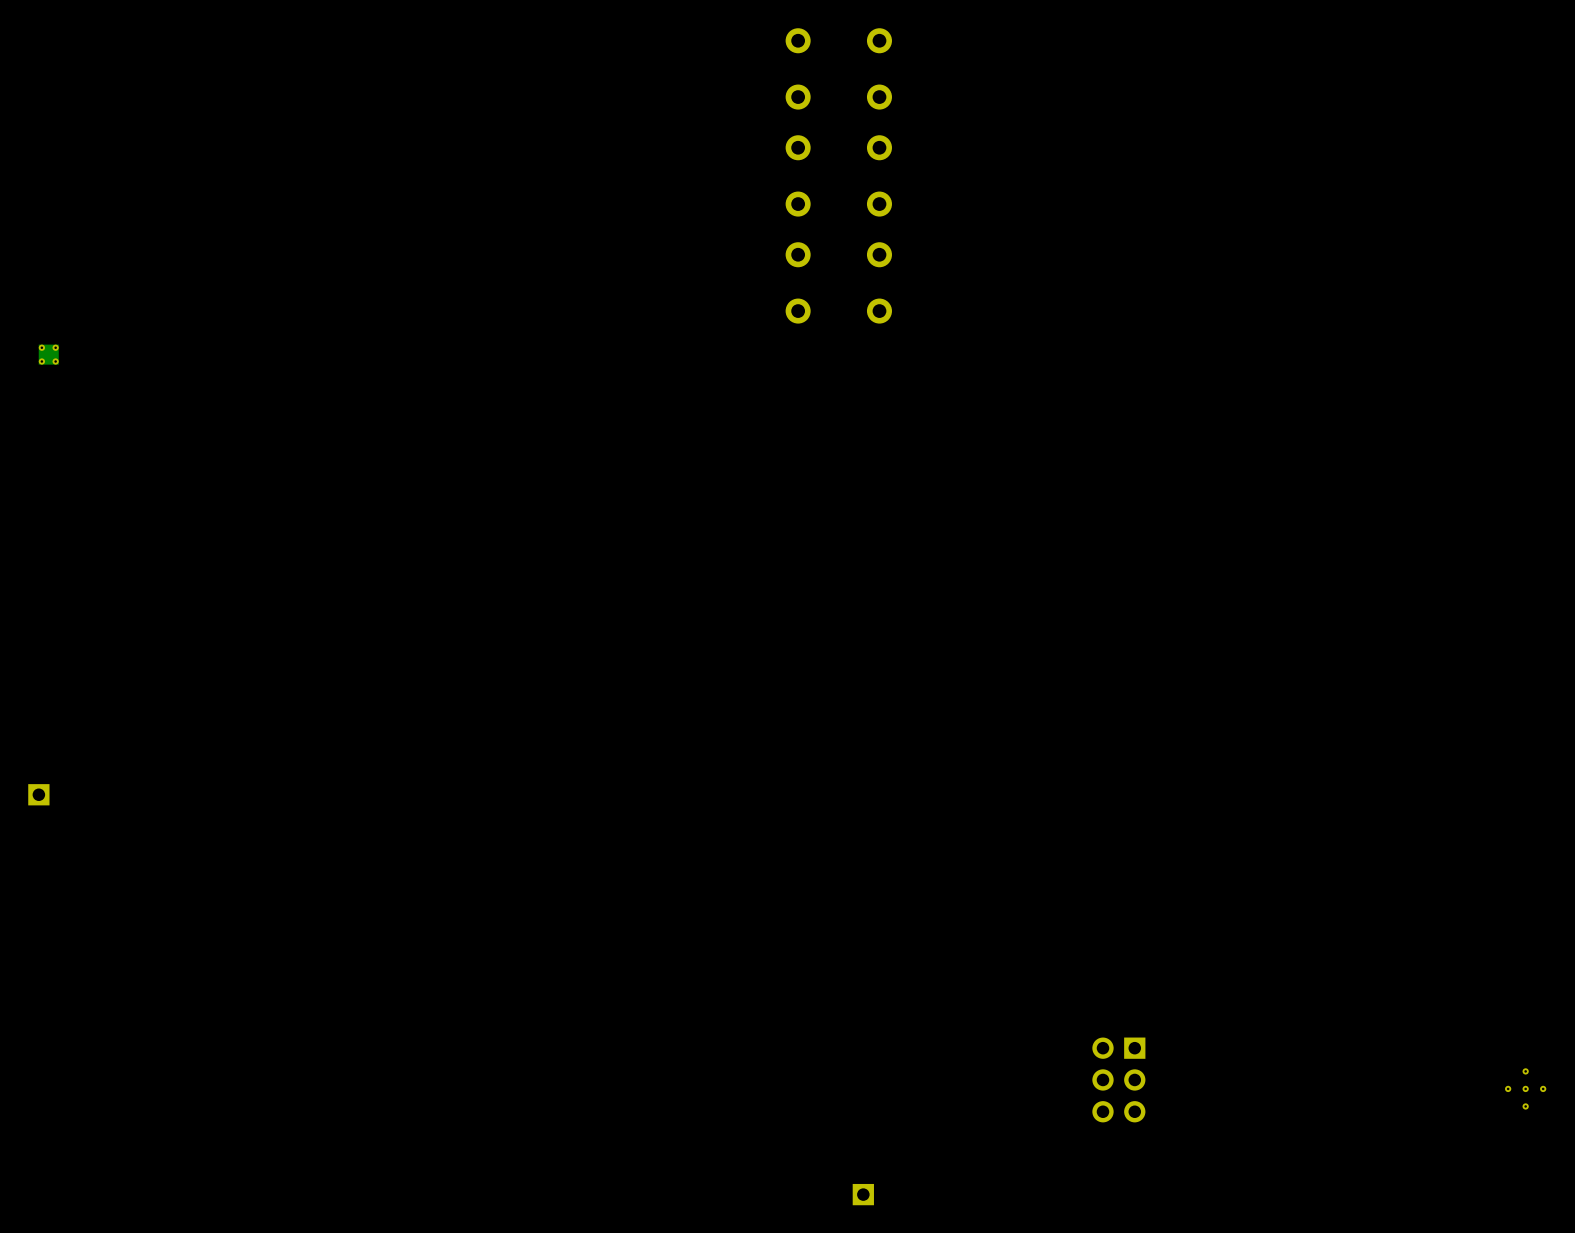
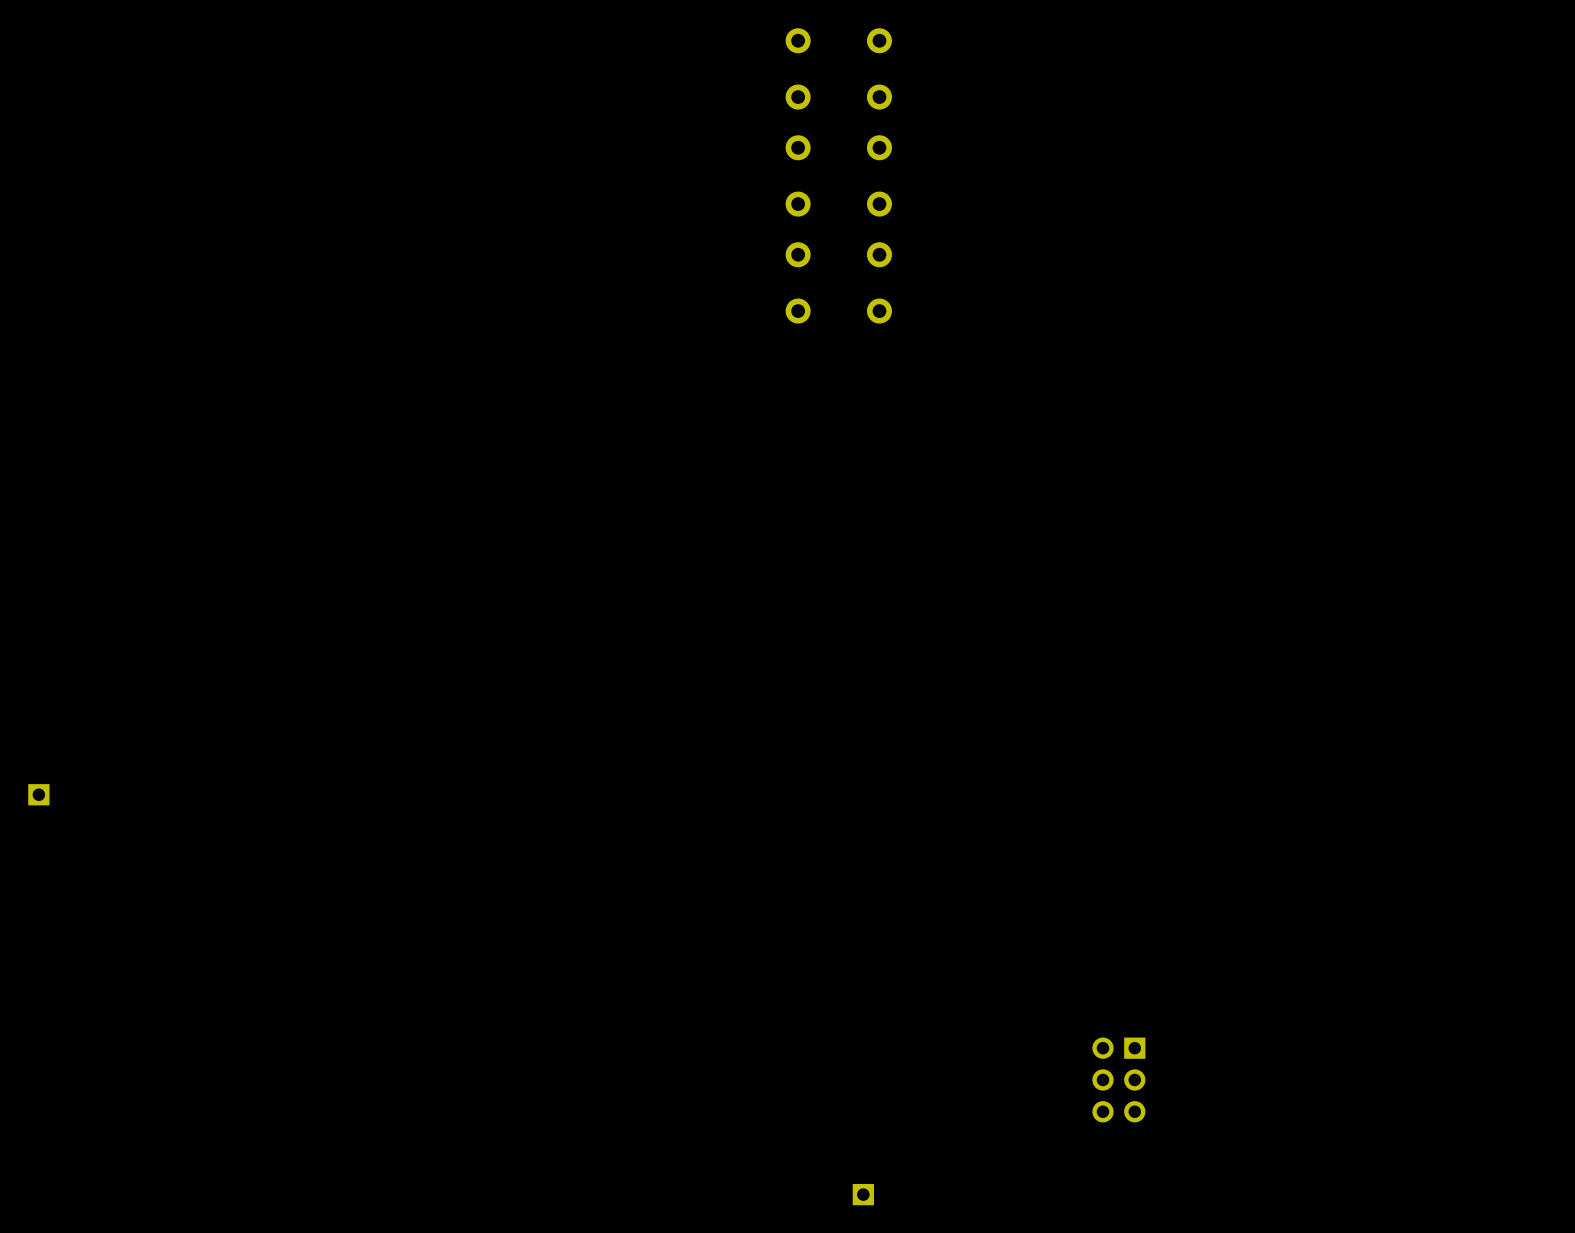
part: (48, 354) -> none
part: (1525, 1088) -> none

